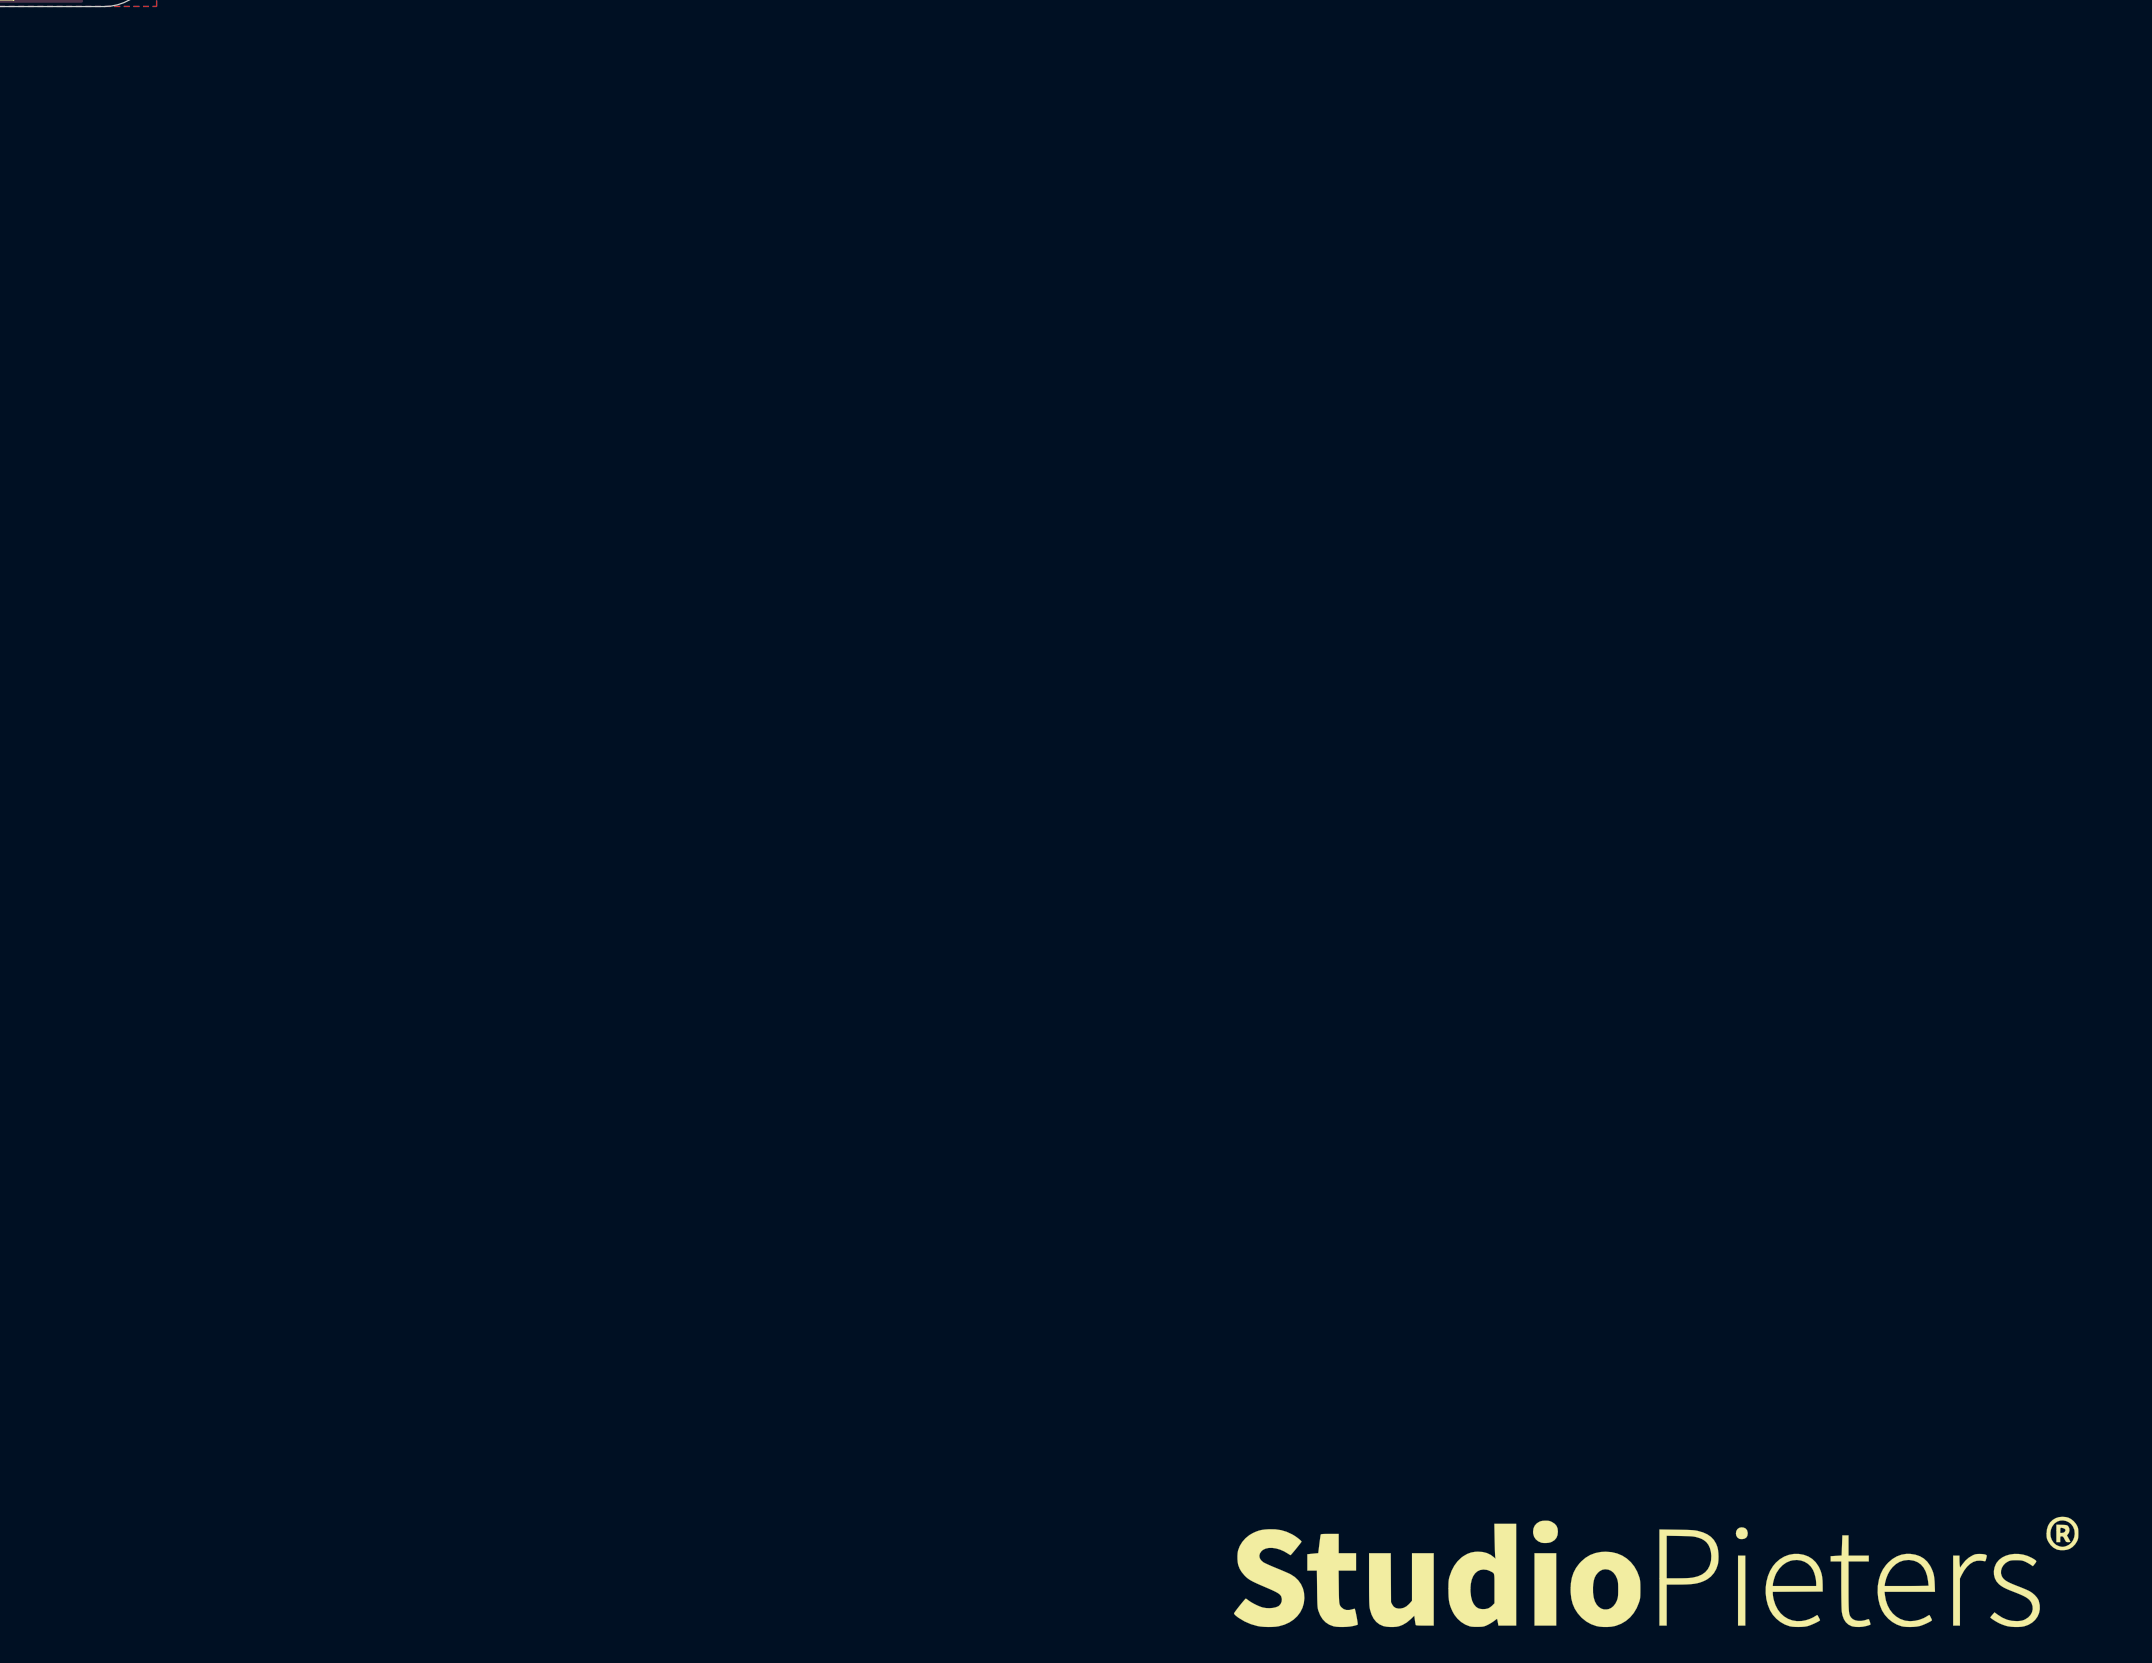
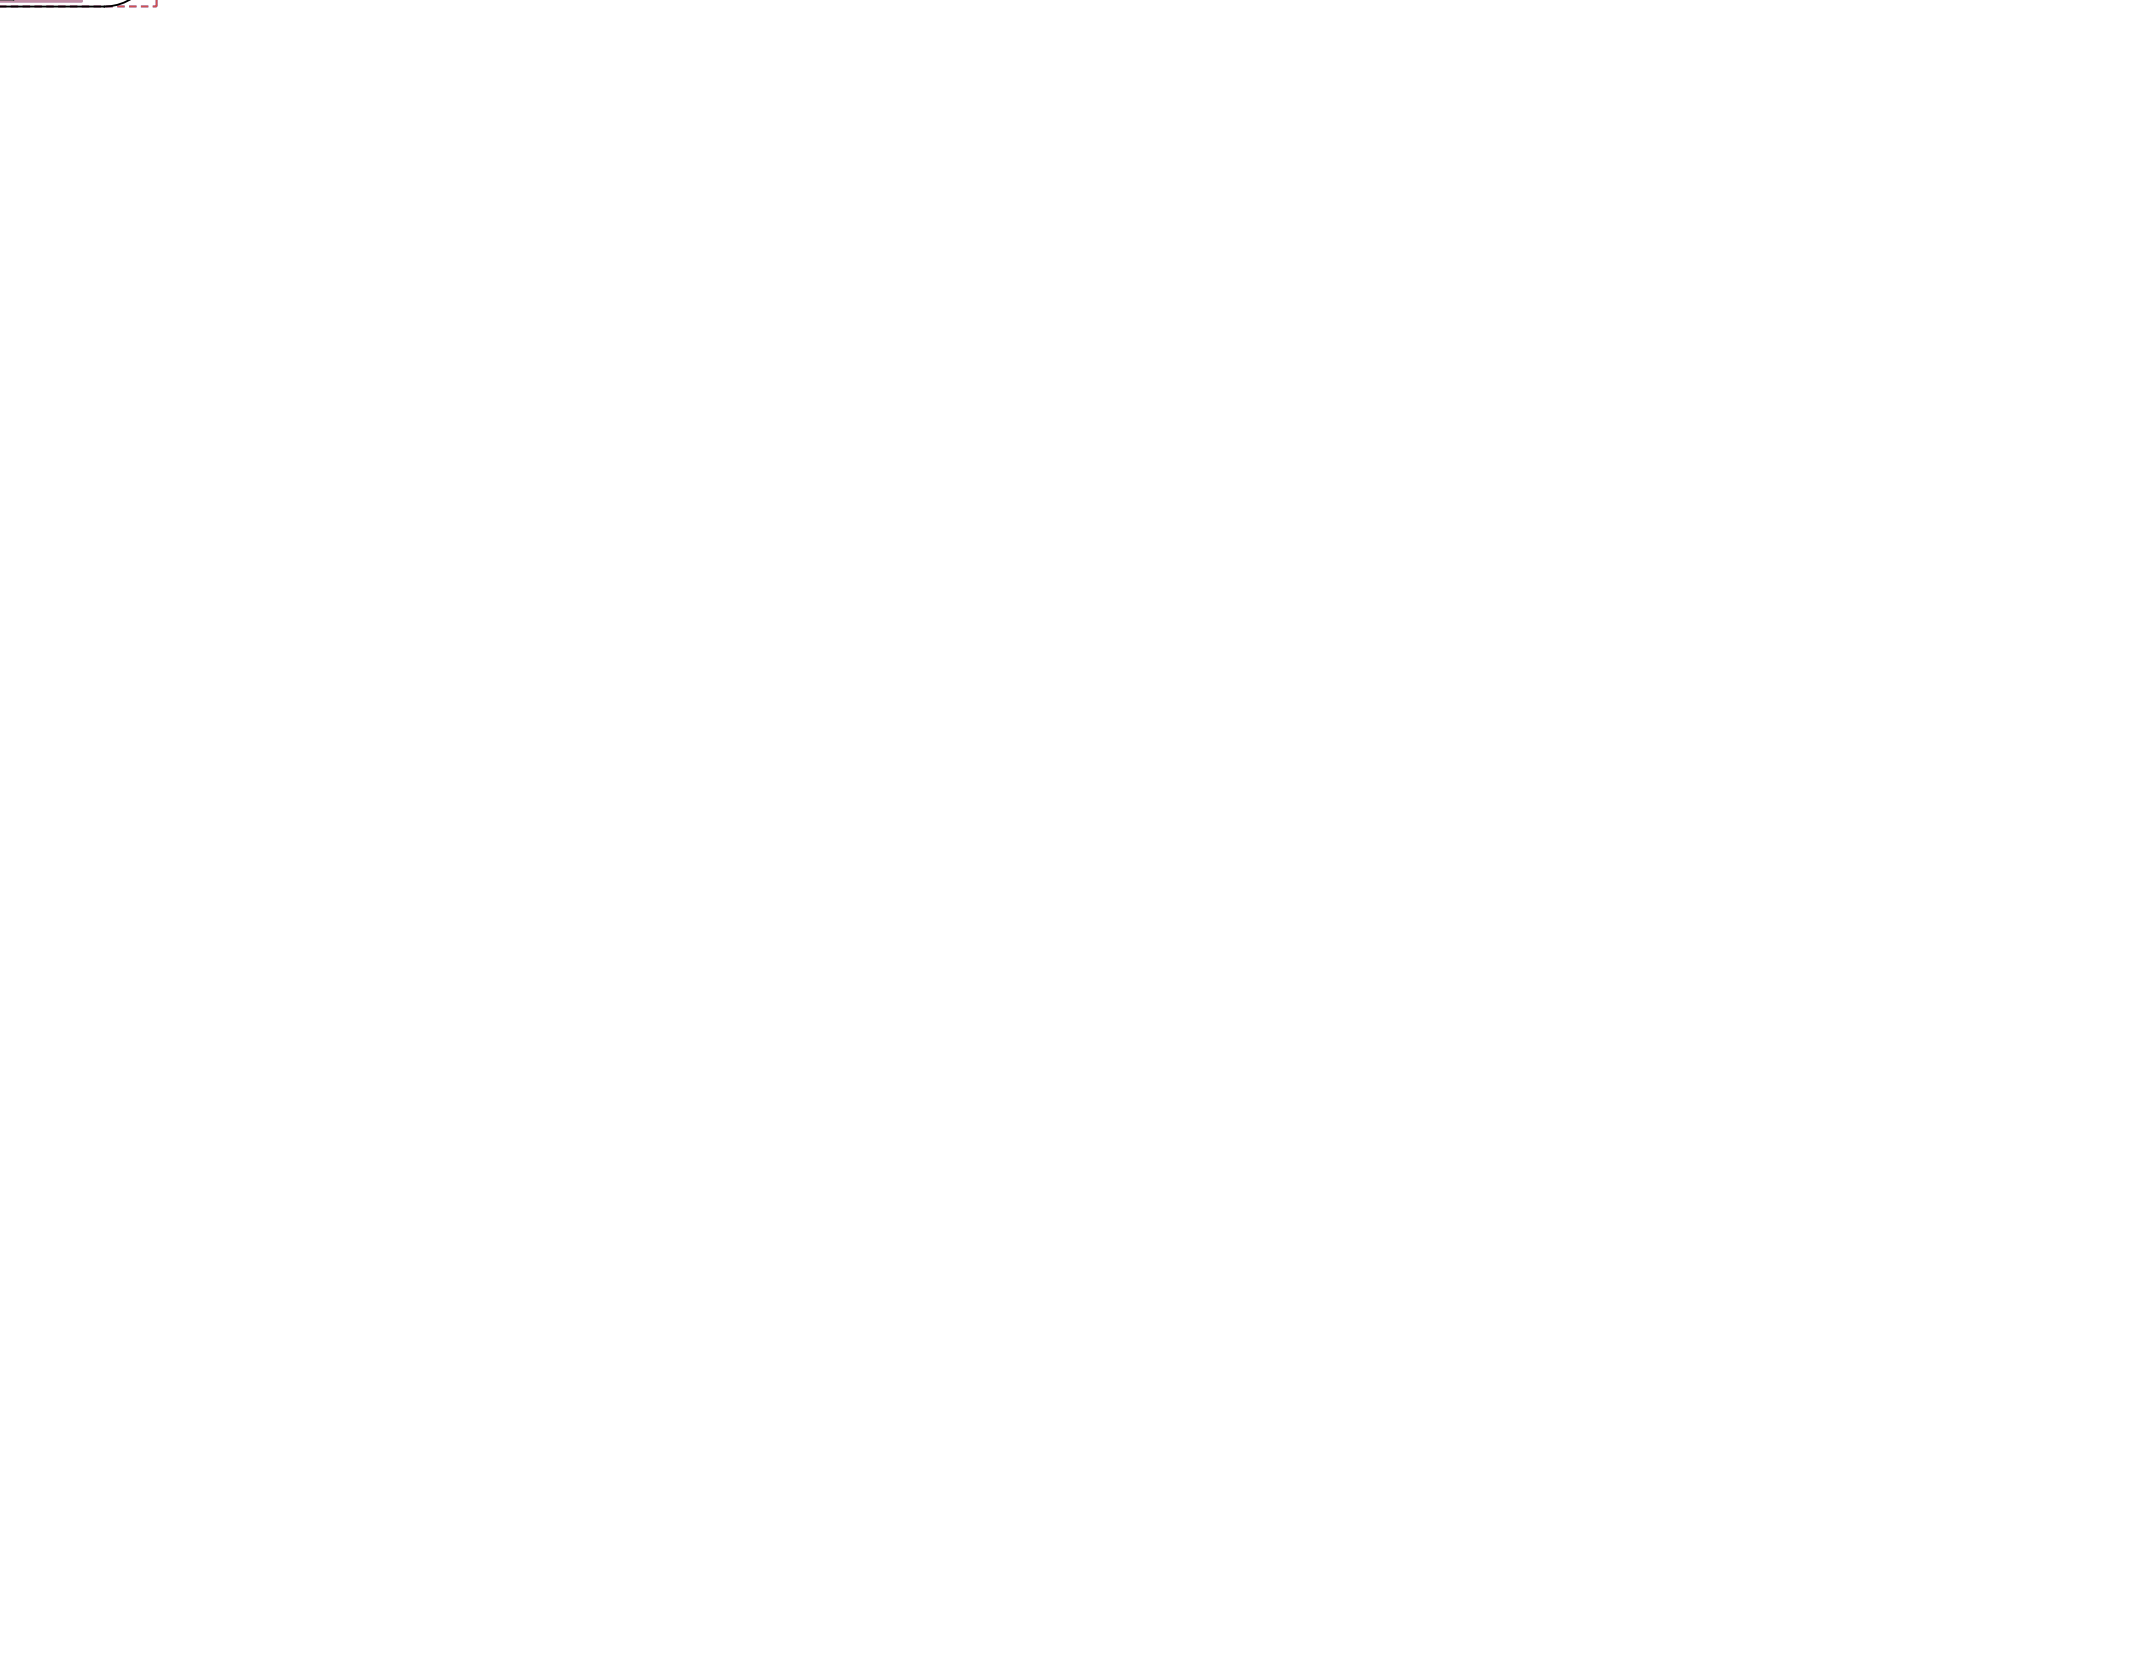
drawing: [1233, 1516, 2079, 1628] -> none

